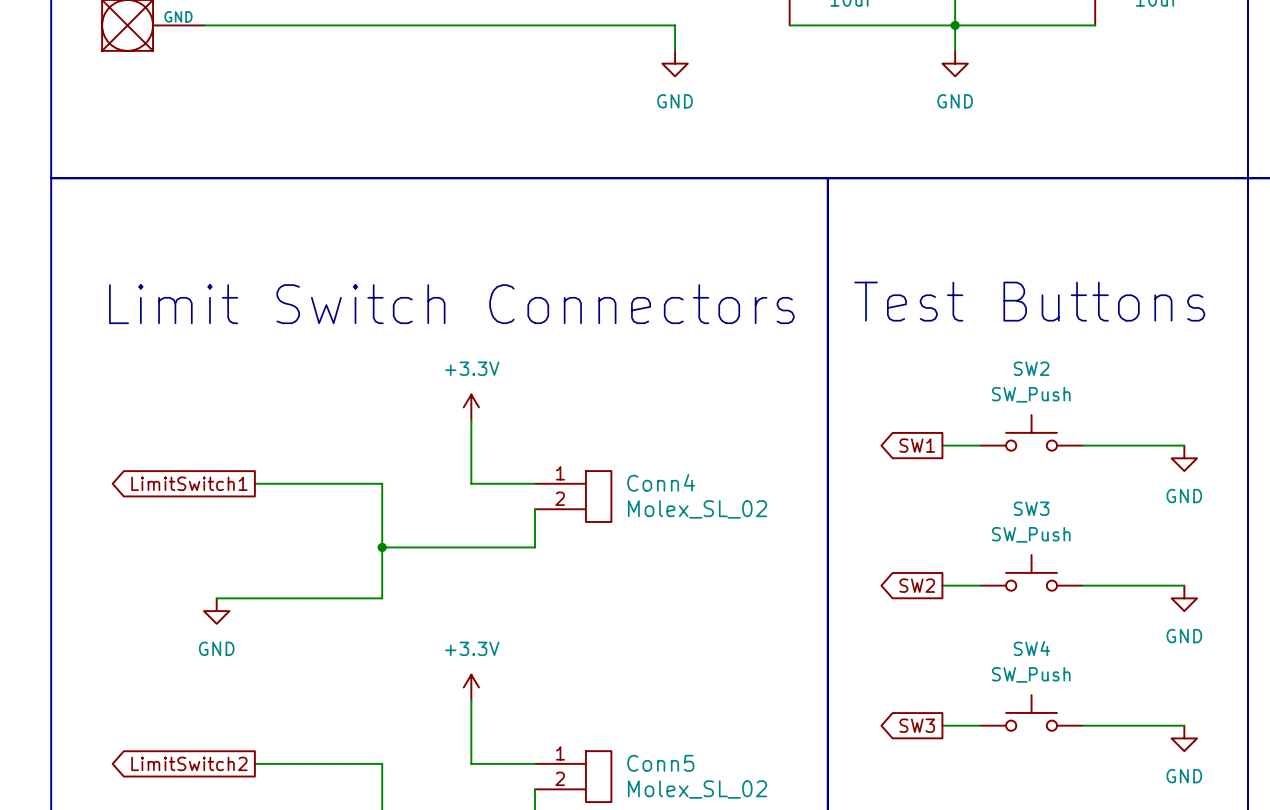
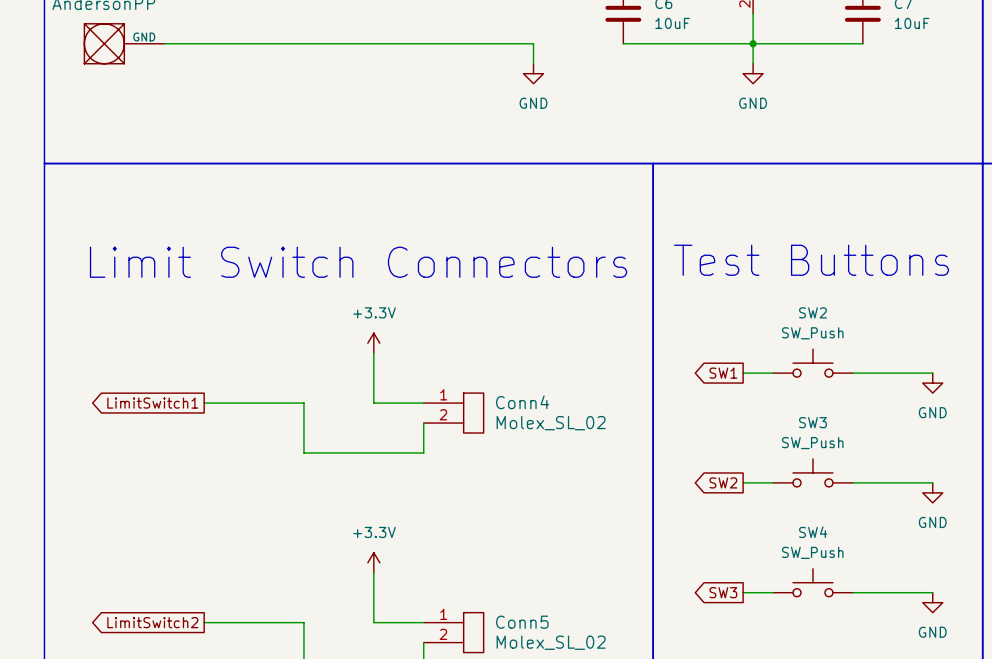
wire: (382, 547) (382, 598) (216, 598) -> none
junction: (382, 547) -> none
power symbol: GND (216, 611) -> none

